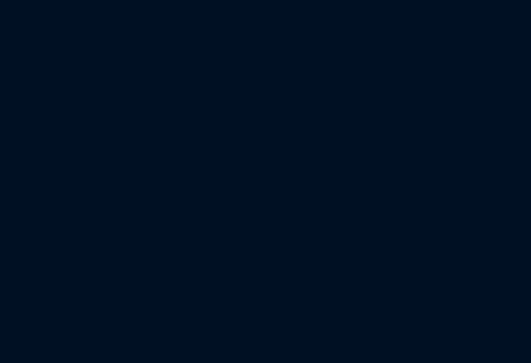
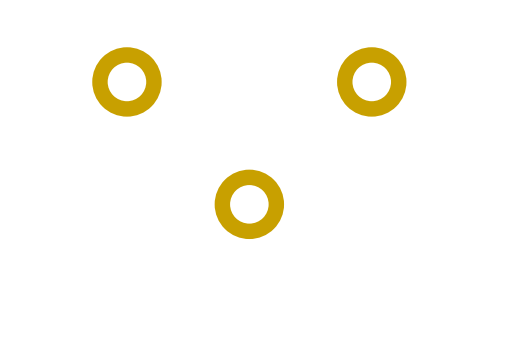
part: none -> (249, 143)

